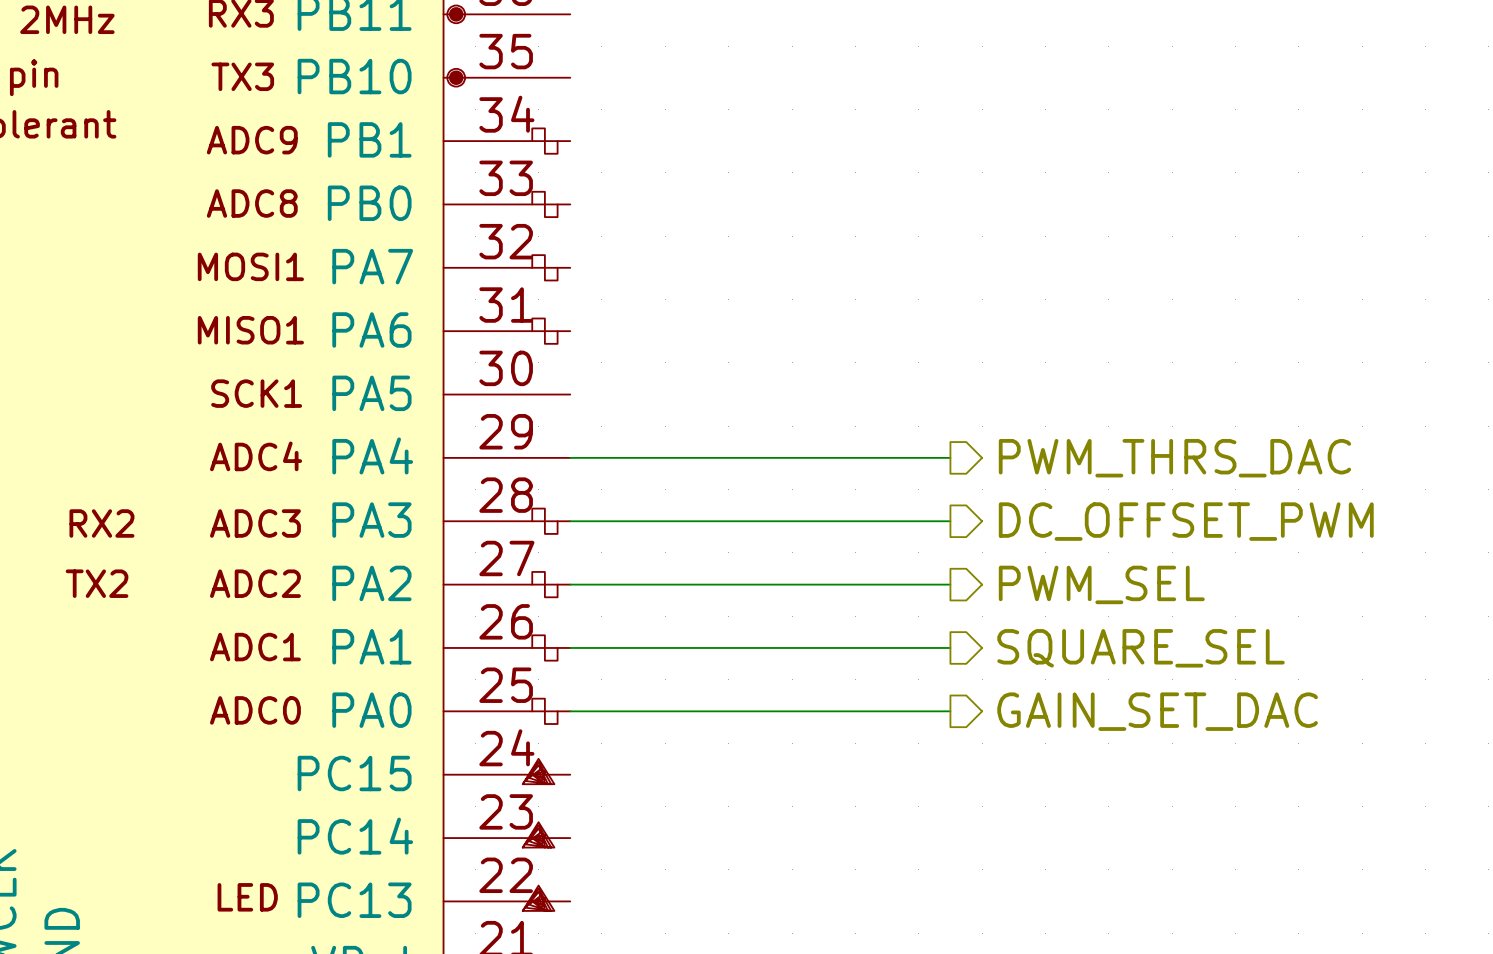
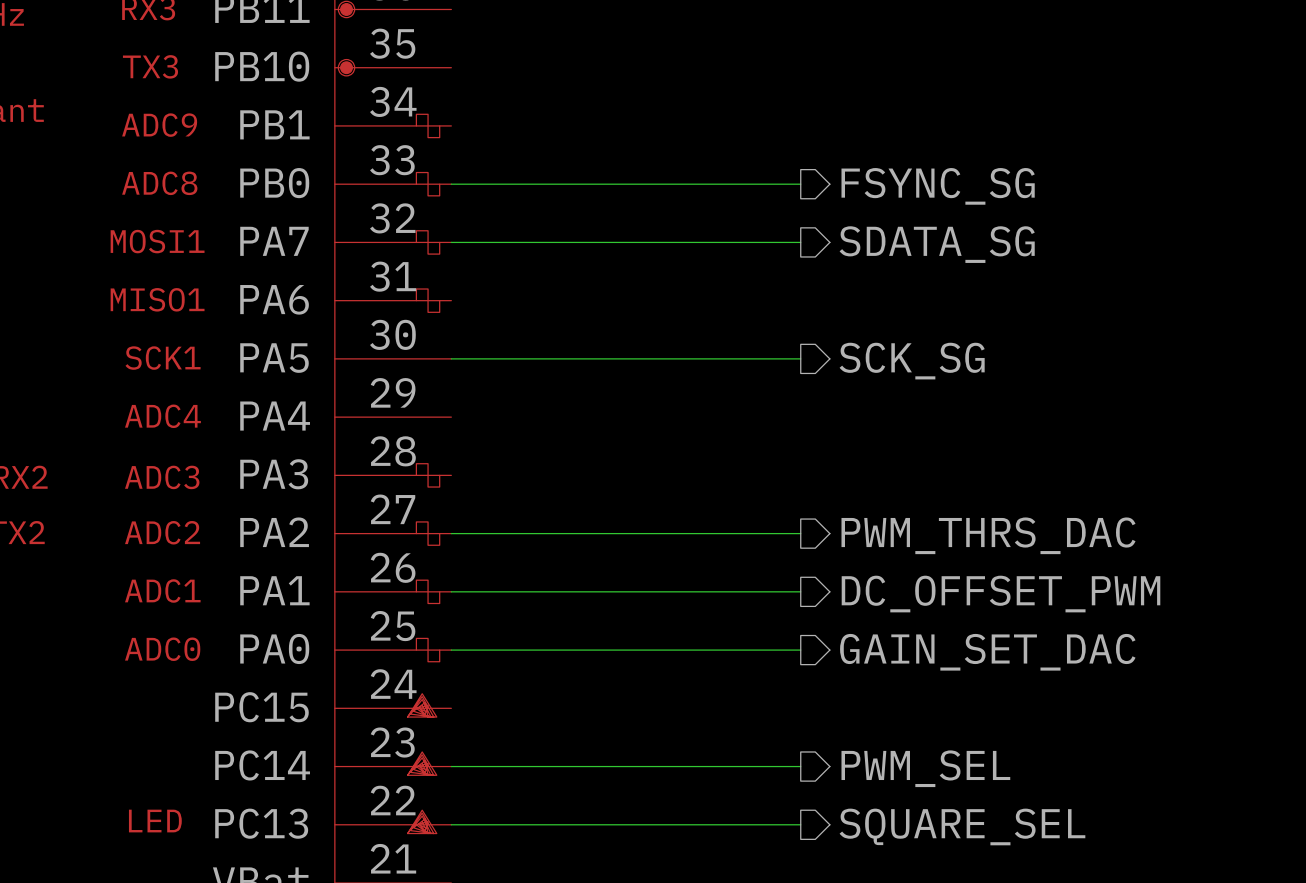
hierarchical label: none -> FSYNC_SG (938, 186)
hierarchical label: none -> SDATA_SG (937, 244)
wire: none -> (451, 358) (800, 358)
hierarchical label: none -> SCK_SG (912, 361)
wire: (570, 457) (950, 457) -> (451, 184) (800, 184)
hierarchical label: PWM_THRS_DAC (1174, 458) -> none
wire: (570, 521) (950, 521) -> (451, 242) (800, 242)
hierarchical label: DC_OFFSET_PWM (1186, 521) -> none
hierarchical label: PWM_SEL (1101, 584) -> PWM_THRS_DAC (988, 535)
hierarchical label: SQUARE_SEL (1141, 648) -> DC_OFFSET_PWM (1001, 594)
wire: none -> (451, 766) (800, 766)
hierarchical label: none -> PWM_SEL (925, 768)
wire: none -> (451, 824) (800, 824)
hierarchical label: none -> SQUARE_SEL (962, 826)

